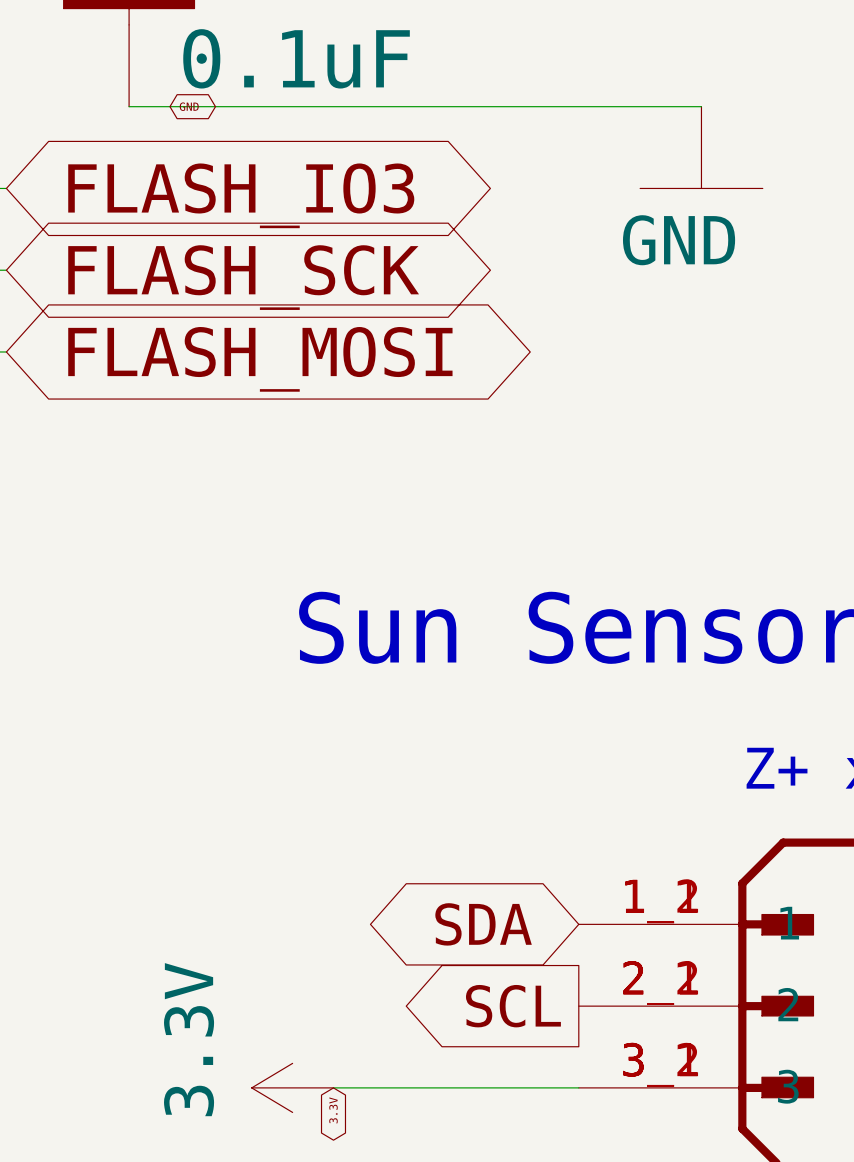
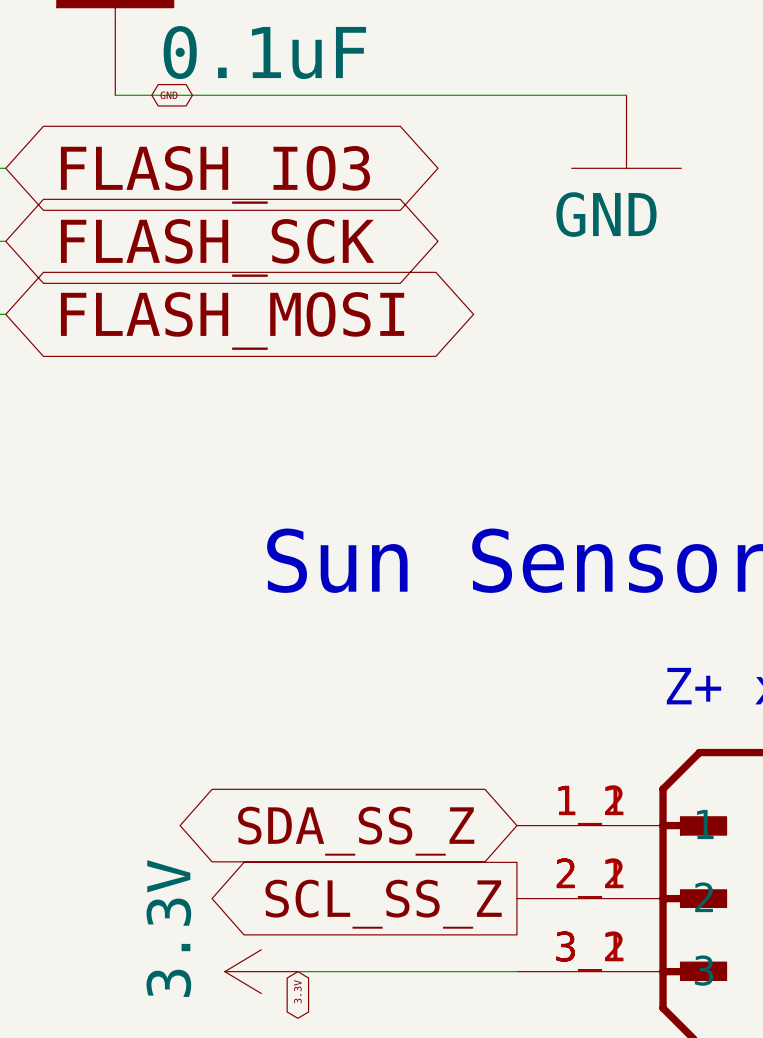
global label: SDA (483, 924) -> SDA_SS_Z (356, 831)
global label: SCL (513, 1006) -> SCL_SS_Z (383, 904)

